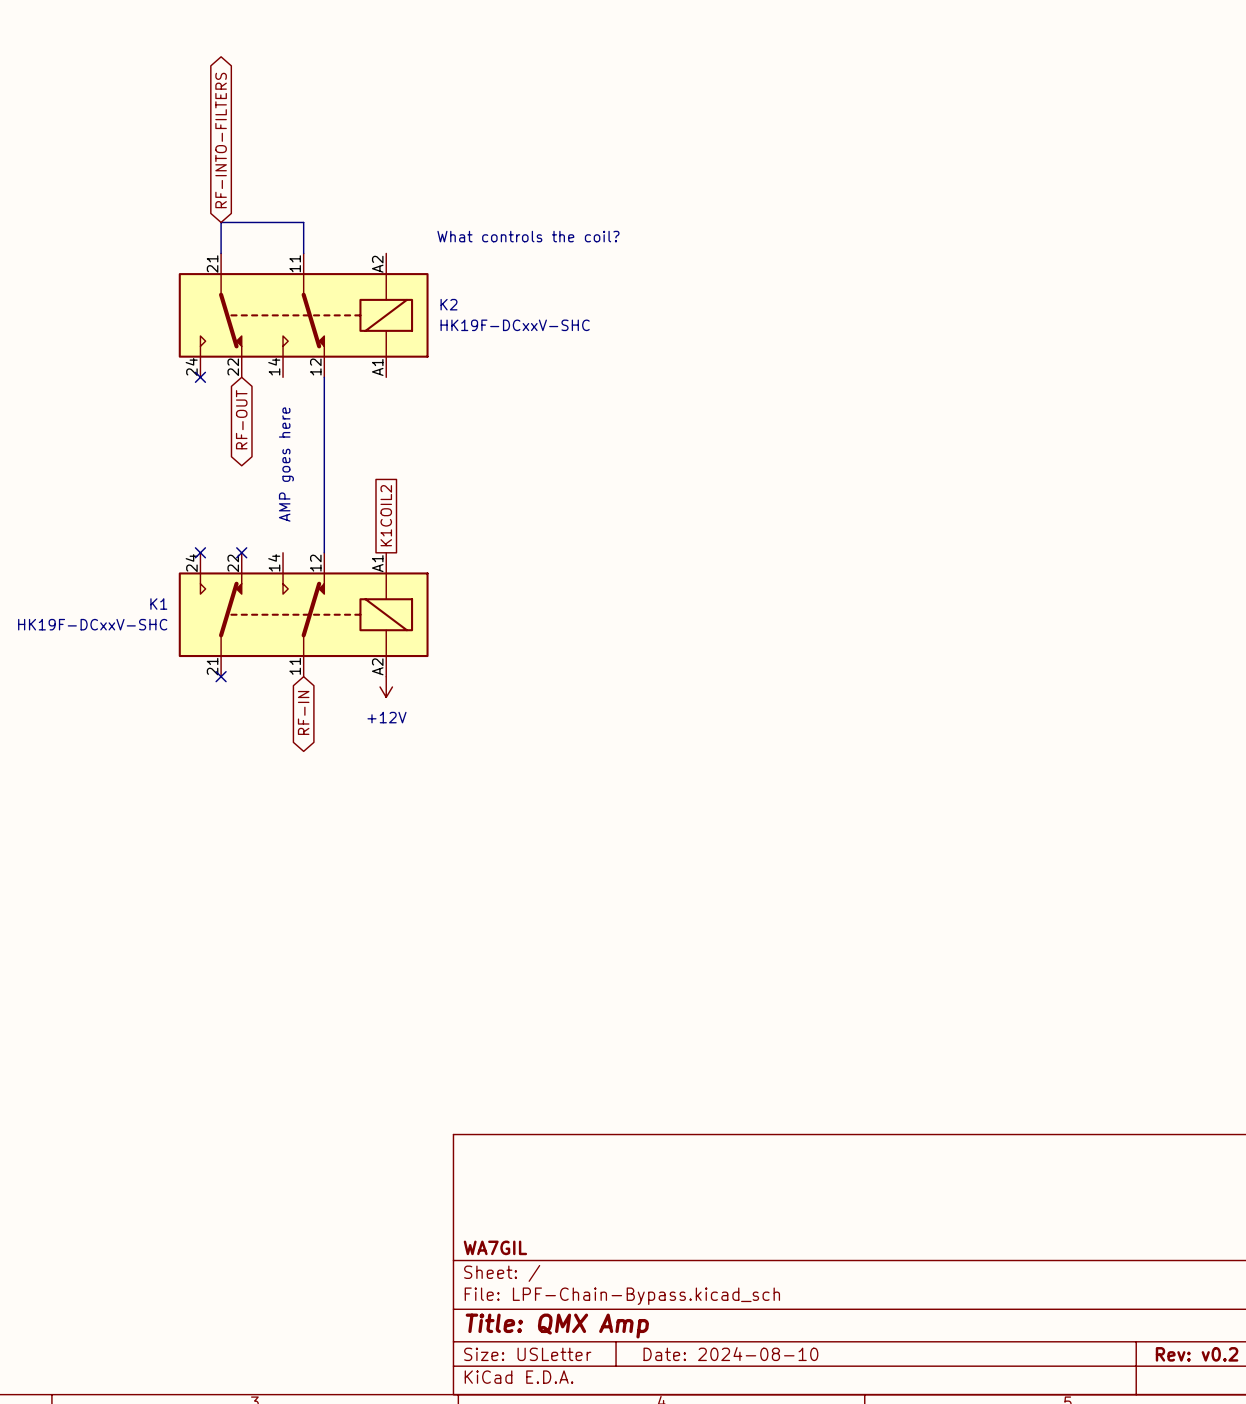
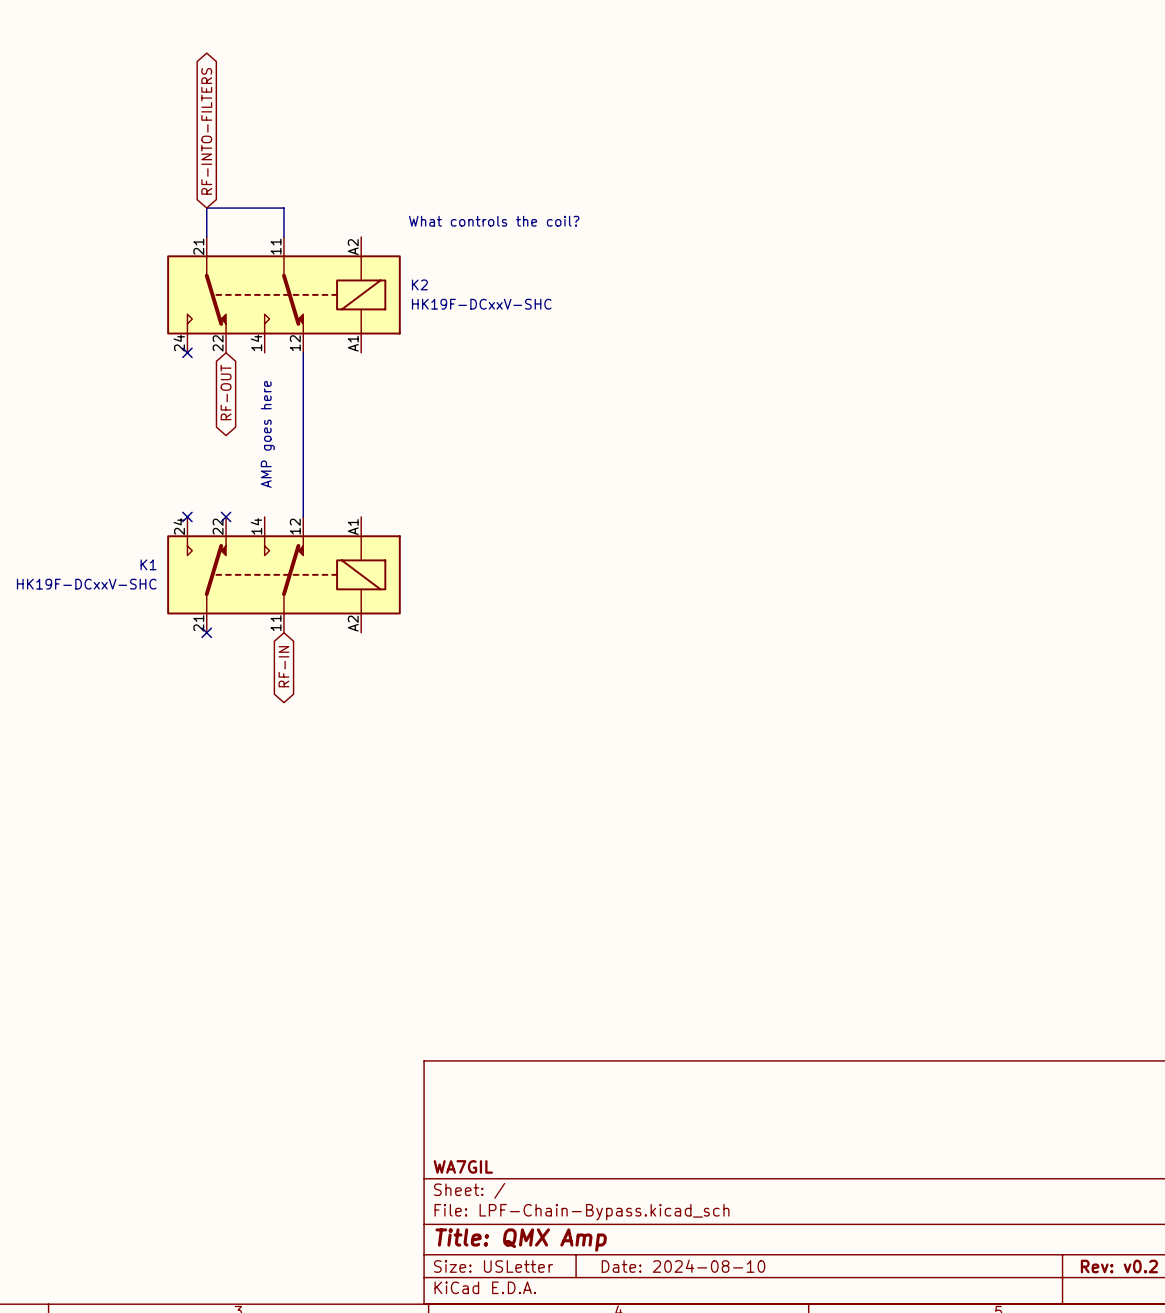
global label: K1COIL2 (386, 515) -> none
power symbol: +12V (386, 686) -> none

